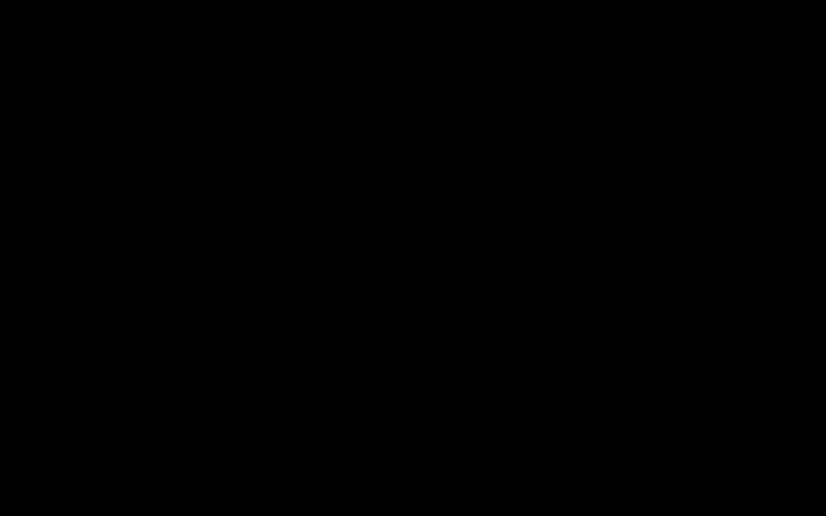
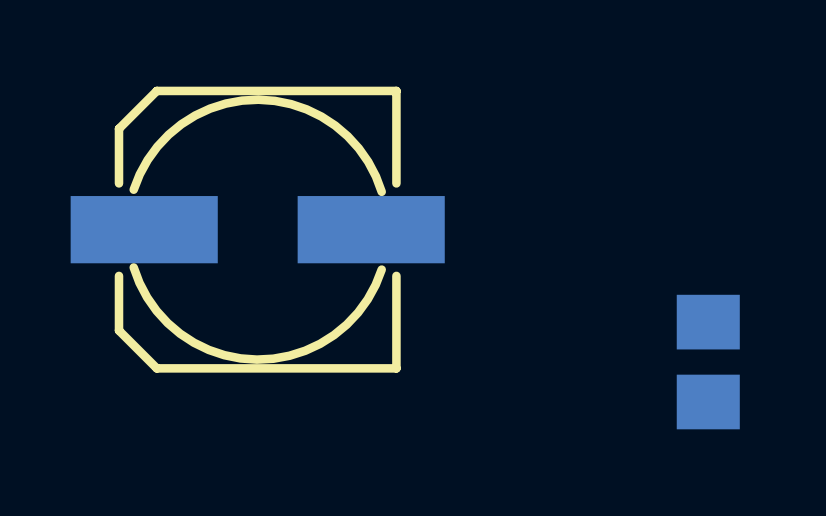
part: none -> (257, 229)
part: none -> (708, 362)

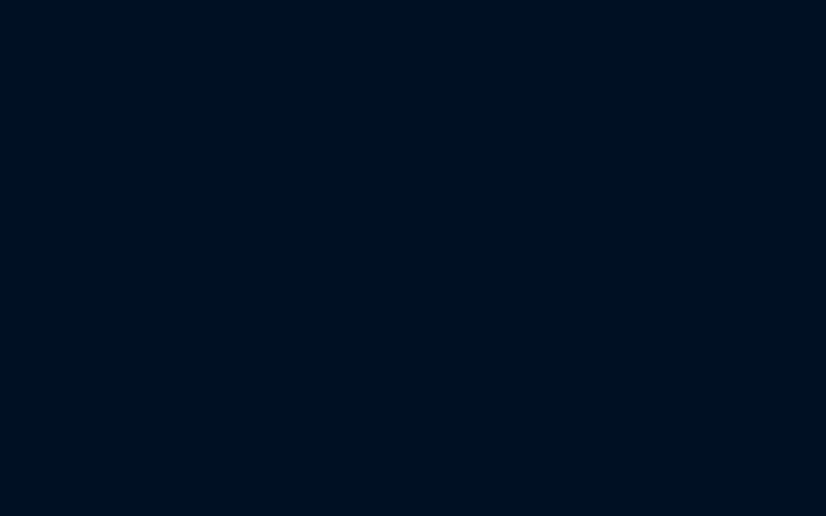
part: (257, 229) -> none
part: (708, 362) -> none

